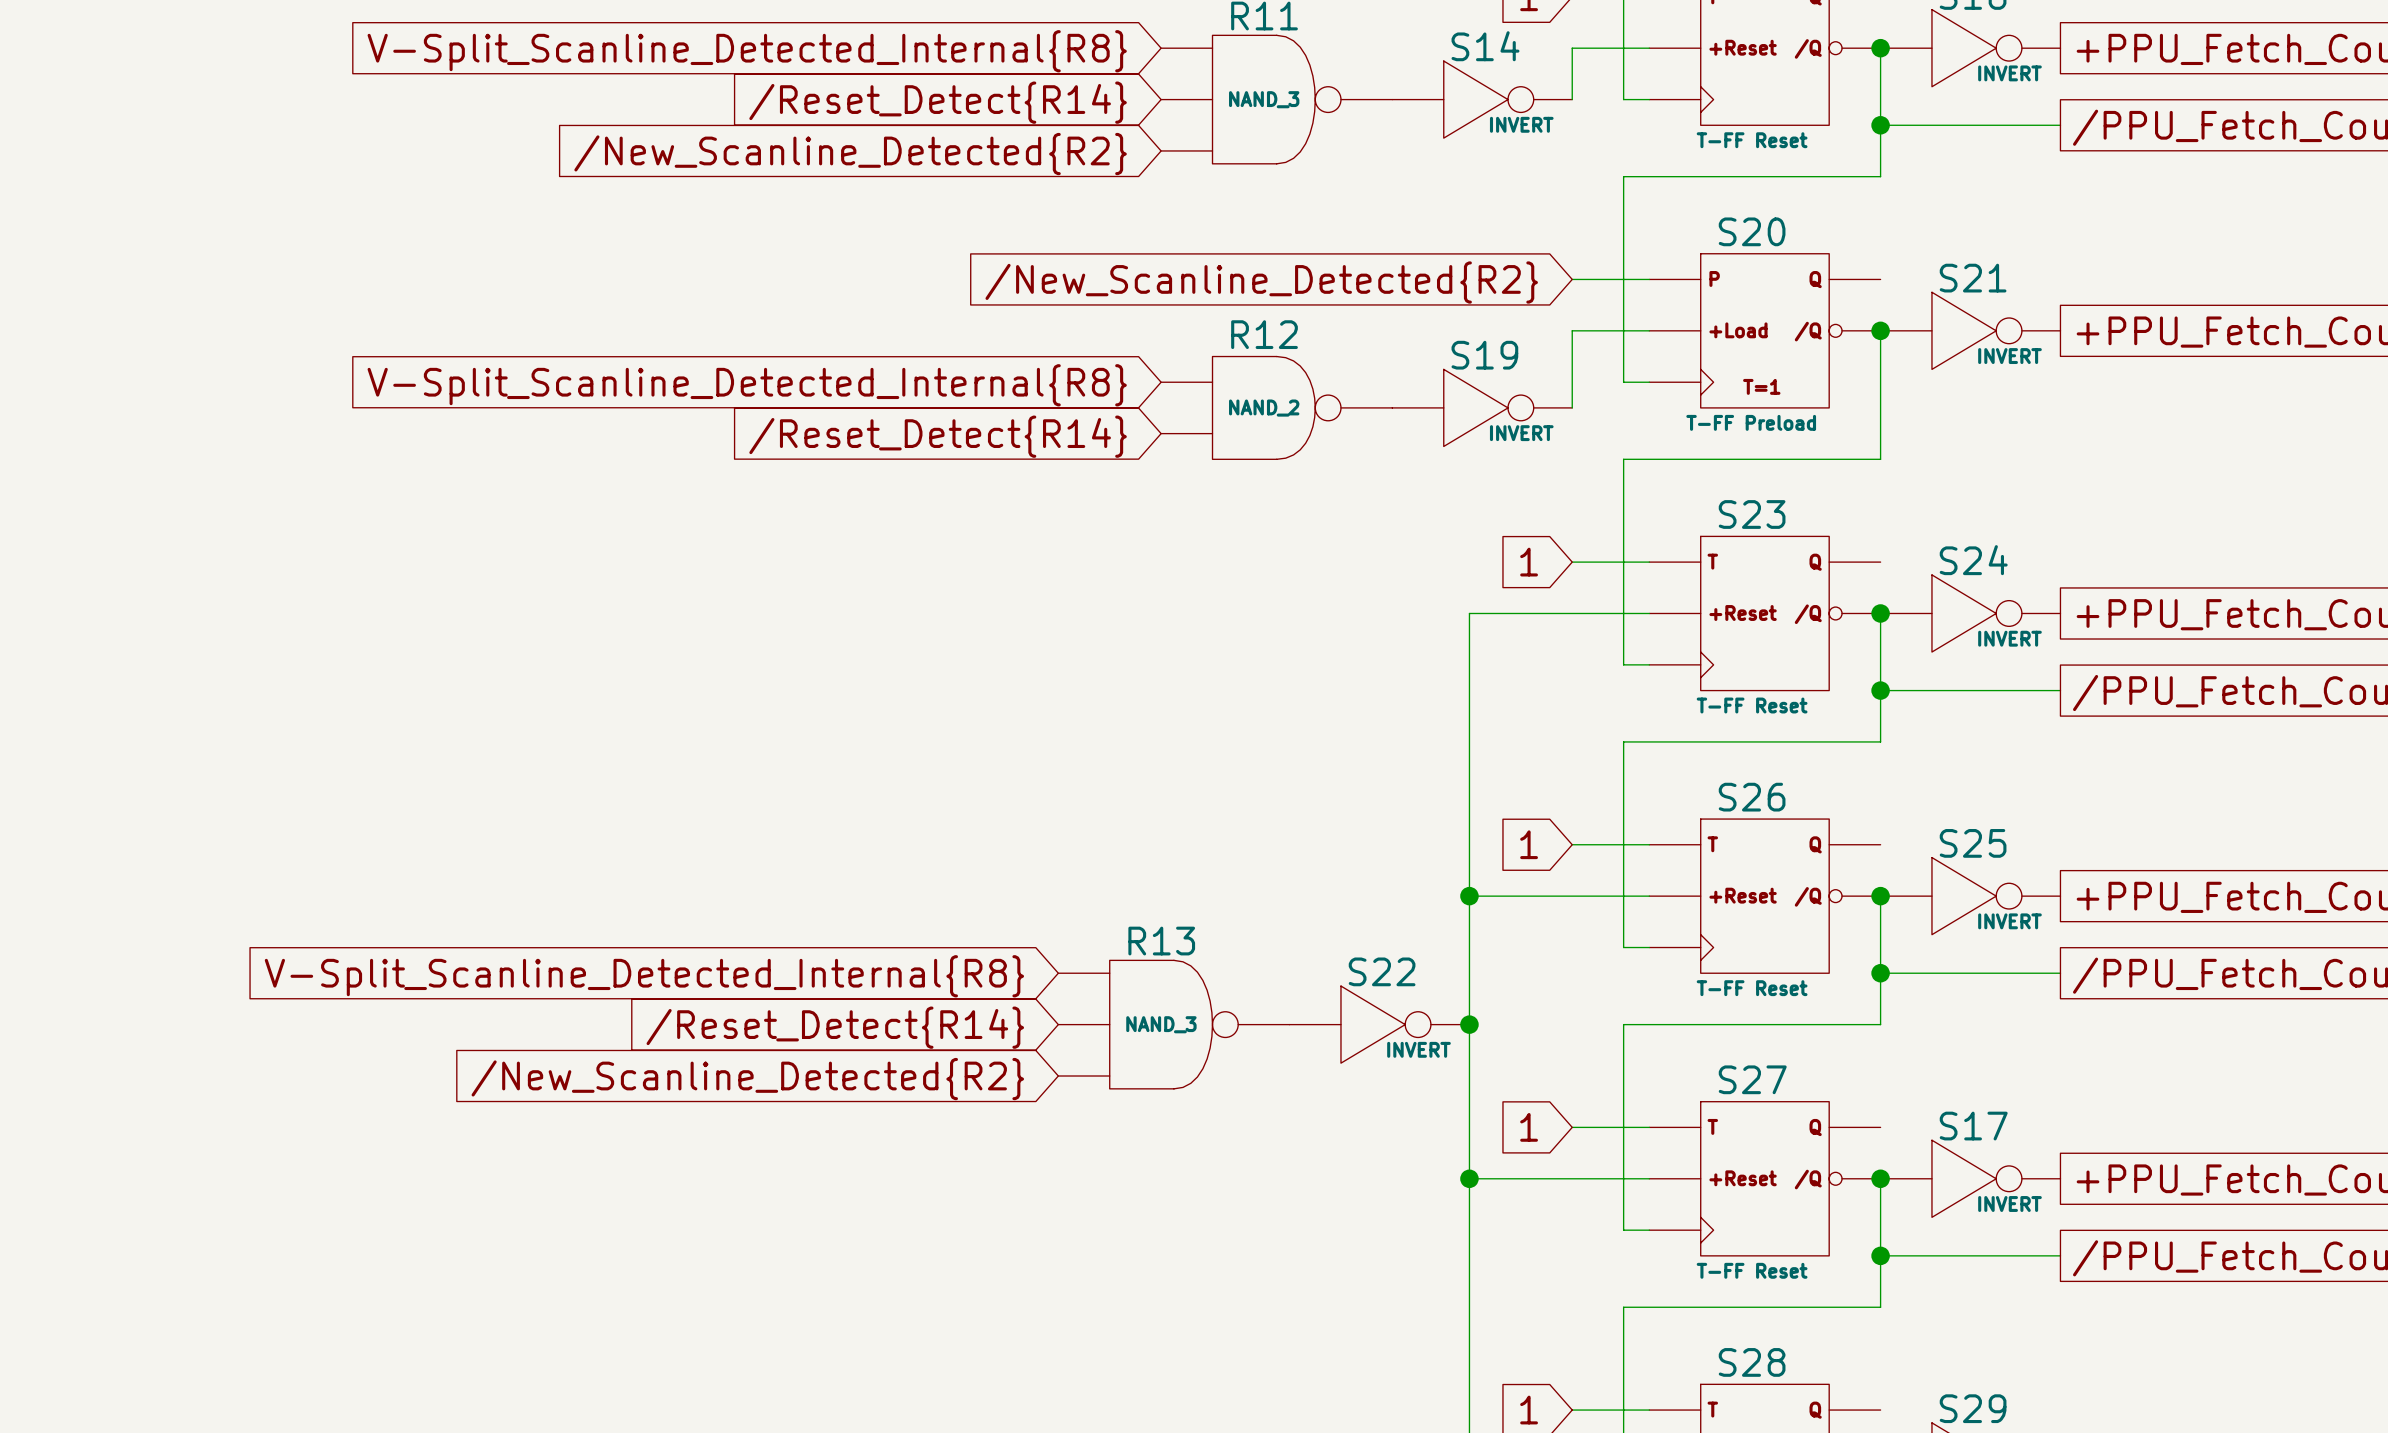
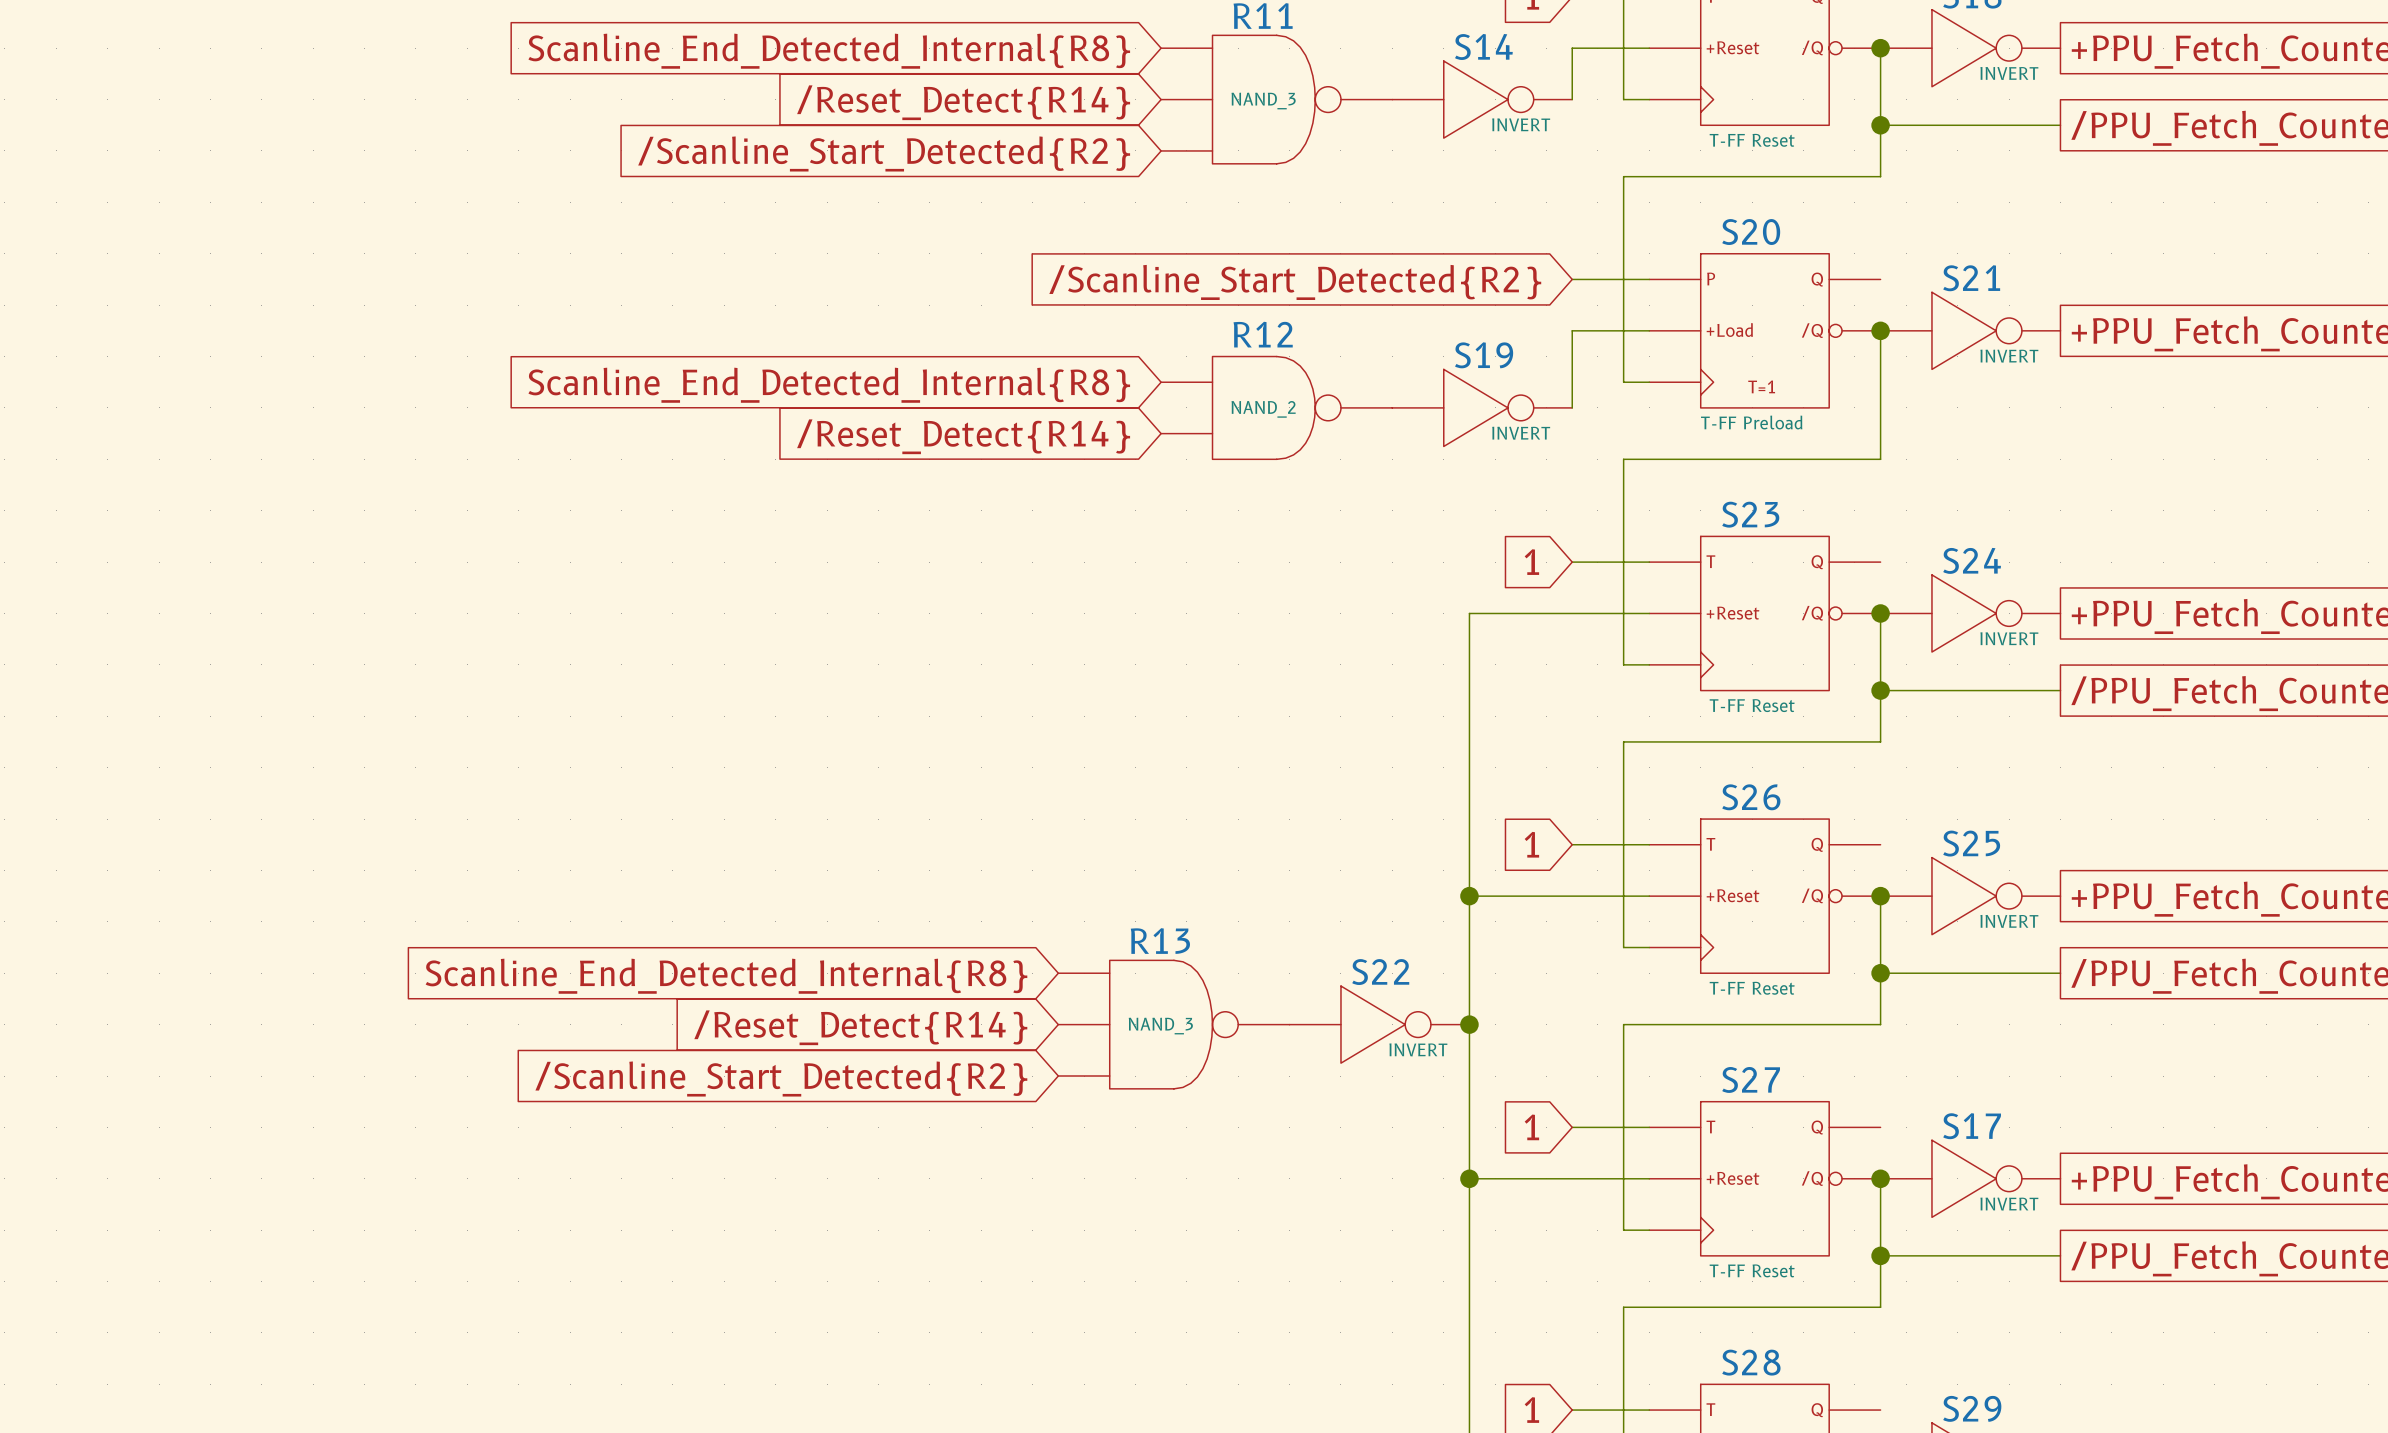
global label: V-Split_Scanline_Detected_Internal{R8} (747, 51) -> Scanline_End_Detected_Internal{R8} (829, 51)
global label: /New_Scanline_Detected{R2} (850, 154) -> /Scanline_Start_Detected{R2} (884, 153)
global label: /New_Scanline_Detected{R2} (1261, 282) -> /Scanline_Start_Detected{R2} (1295, 282)
global label: V-Split_Scanline_Detected_Internal{R8} (747, 385) -> Scanline_End_Detected_Internal{R8} (829, 385)
global label: V-Split_Scanline_Detected_Internal{R8} (644, 976) -> Scanline_End_Detected_Internal{R8} (726, 976)
global label: /New_Scanline_Detected{R2} (747, 1079) -> /Scanline_Start_Detected{R2} (781, 1079)

